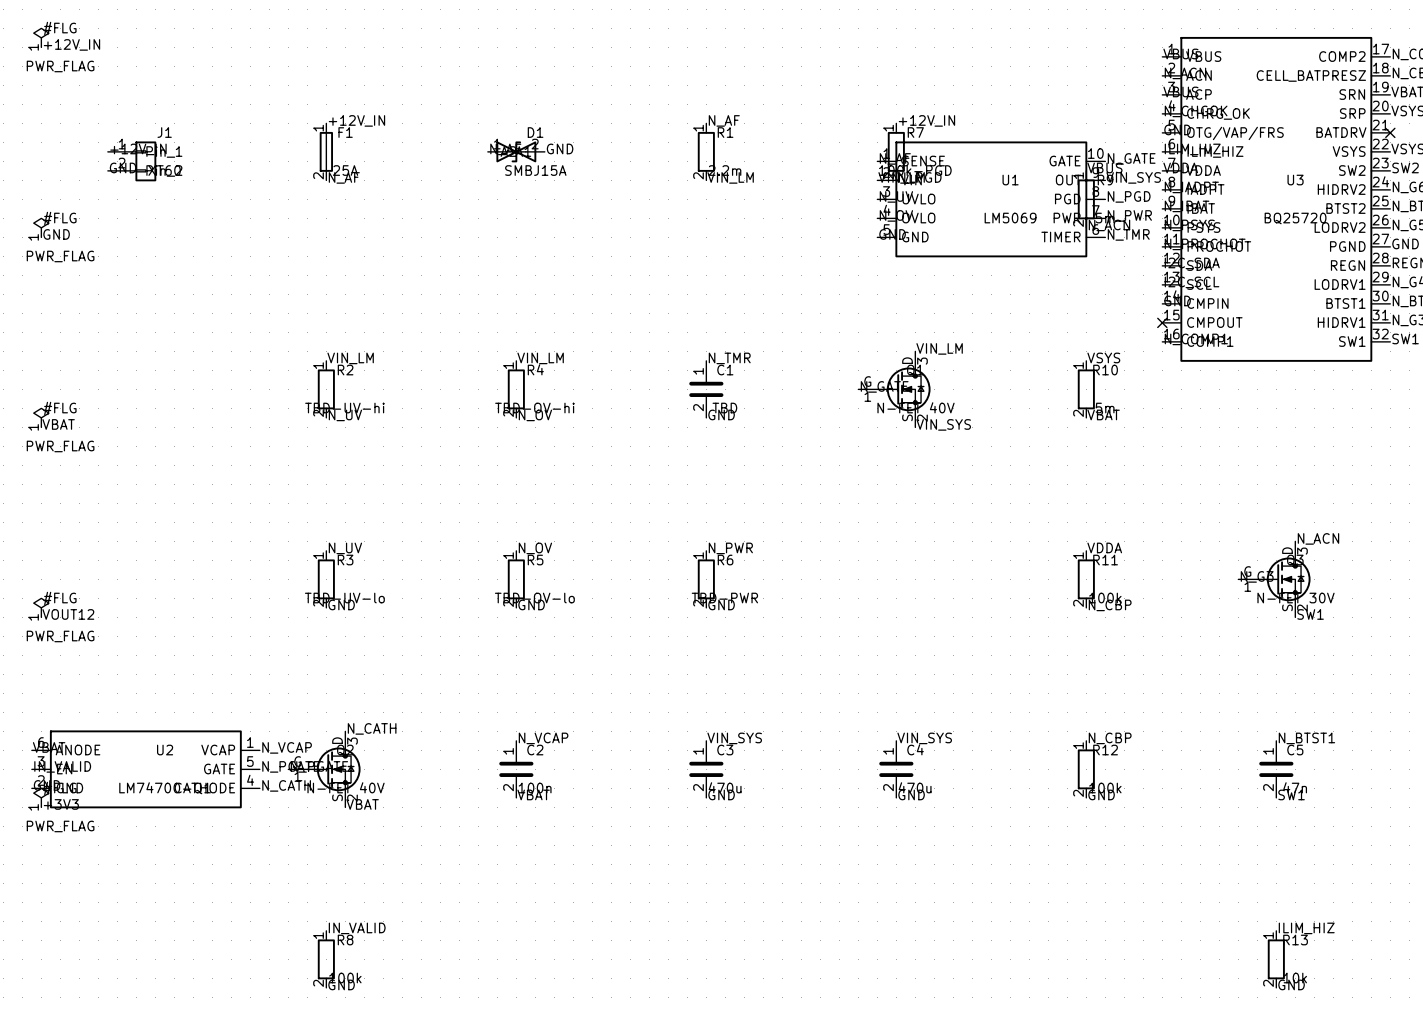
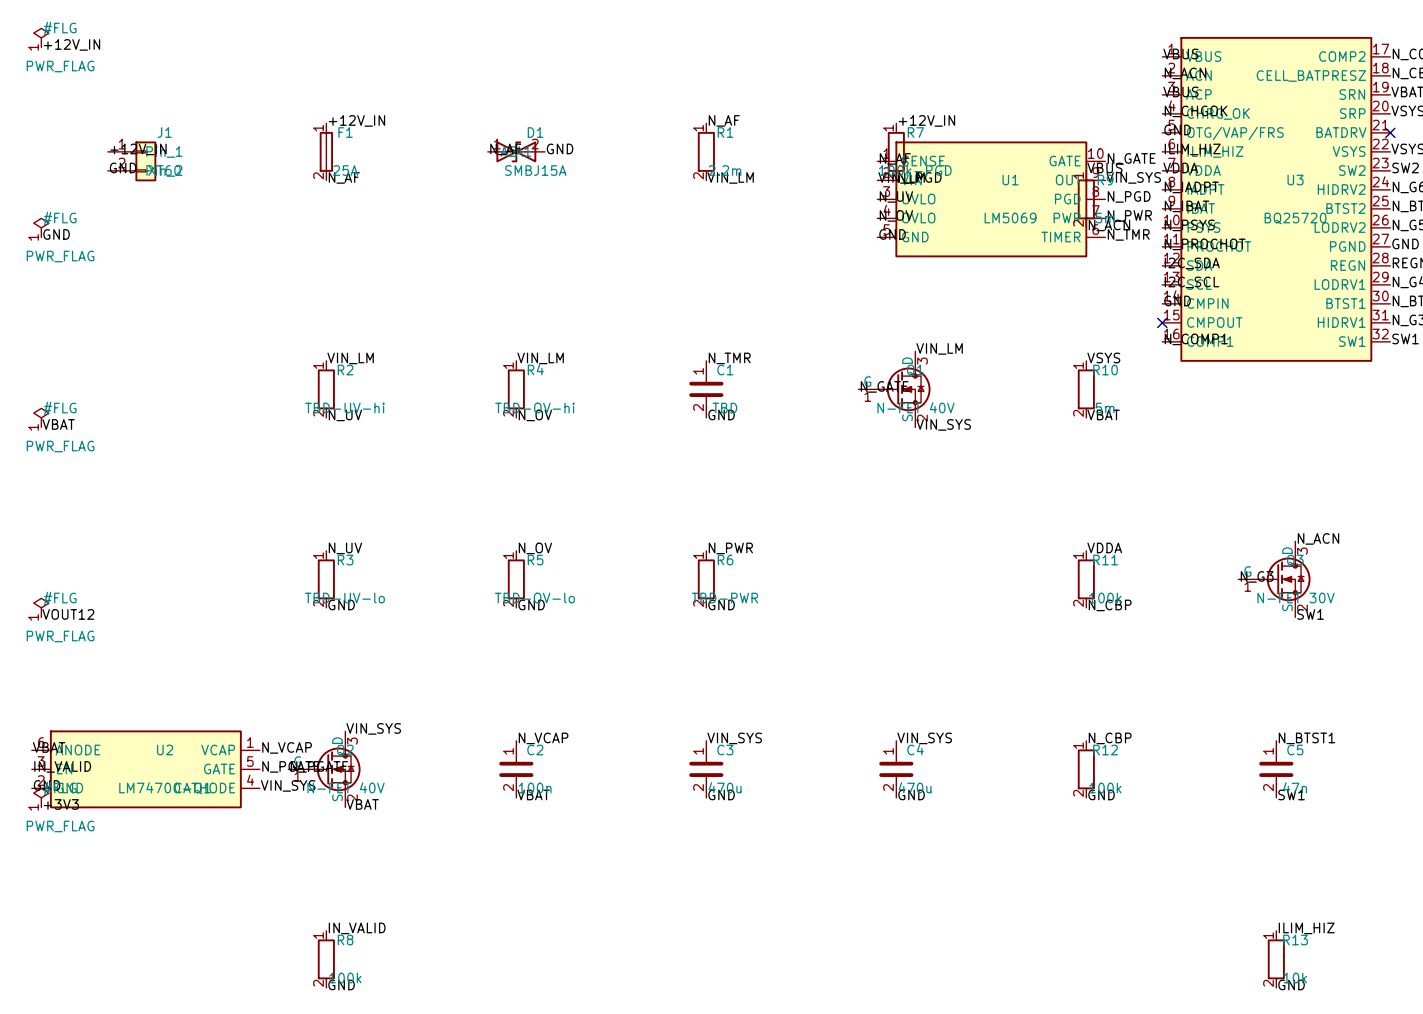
label: N_CATH (372, 728) -> VIN_SYS (373, 728)
label: N_CATH (286, 785) -> VIN_SYS (288, 785)

